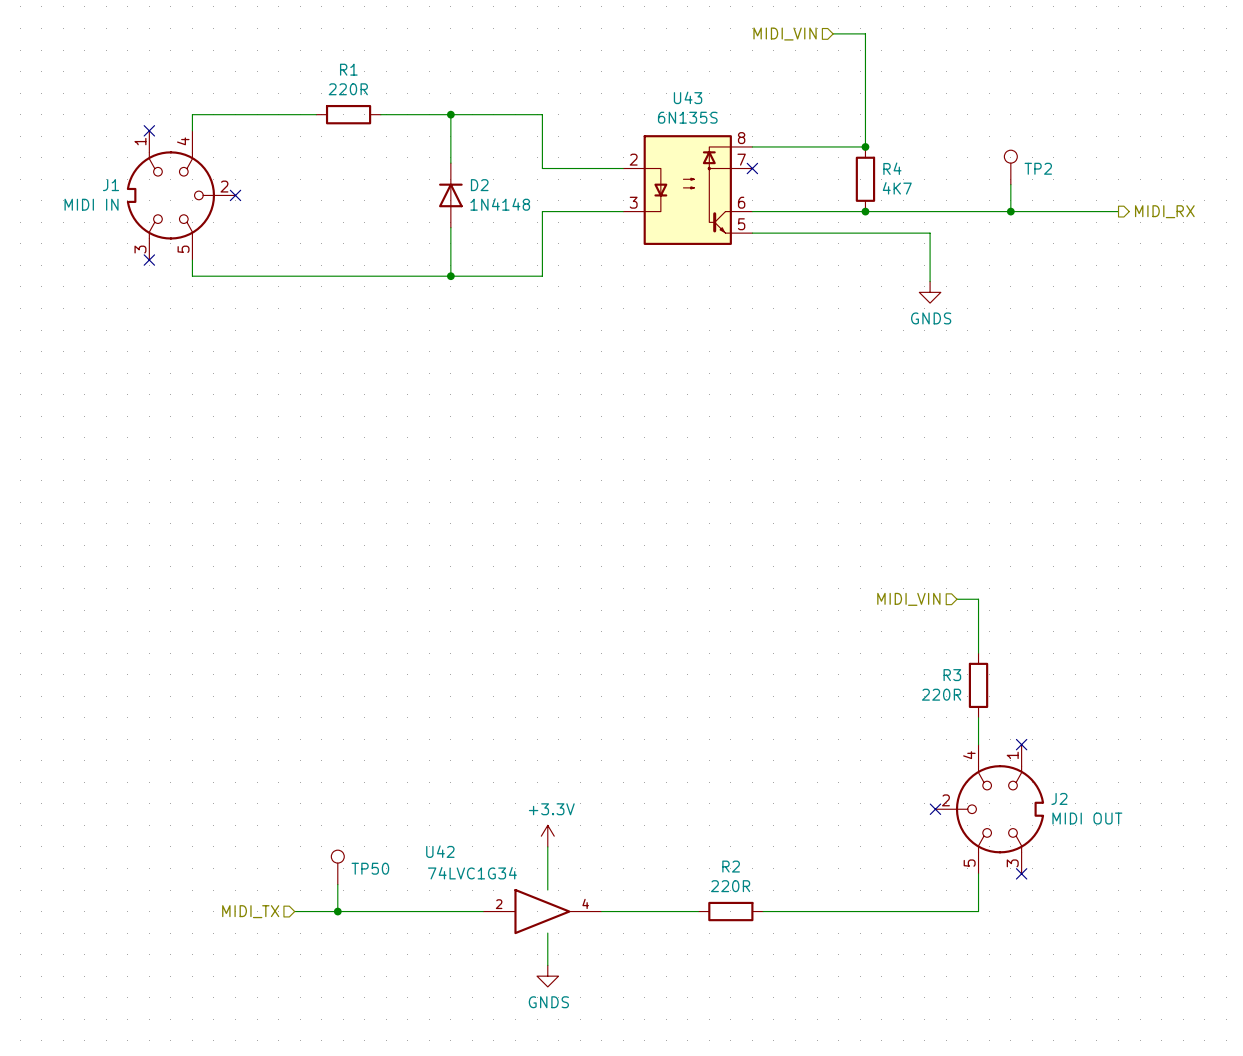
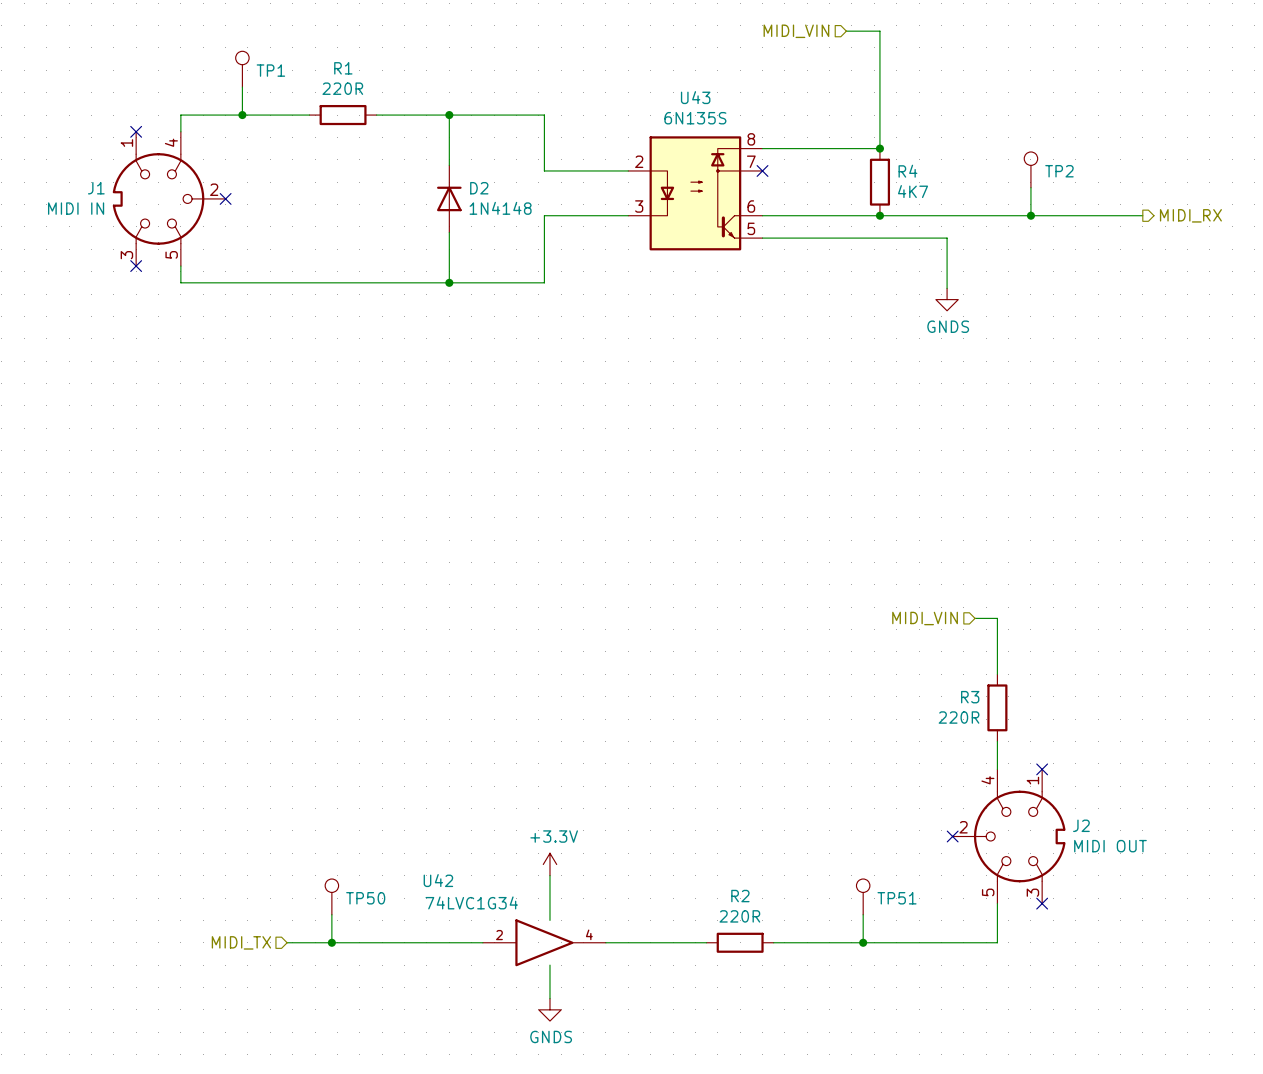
TP1: none -> (242, 69)
wire: none -> (242, 87) (242, 115)
junction: none -> (242, 115)
TP51: none -> (863, 896)
wire: none -> (863, 914) (863, 942)
junction: none -> (863, 942)

